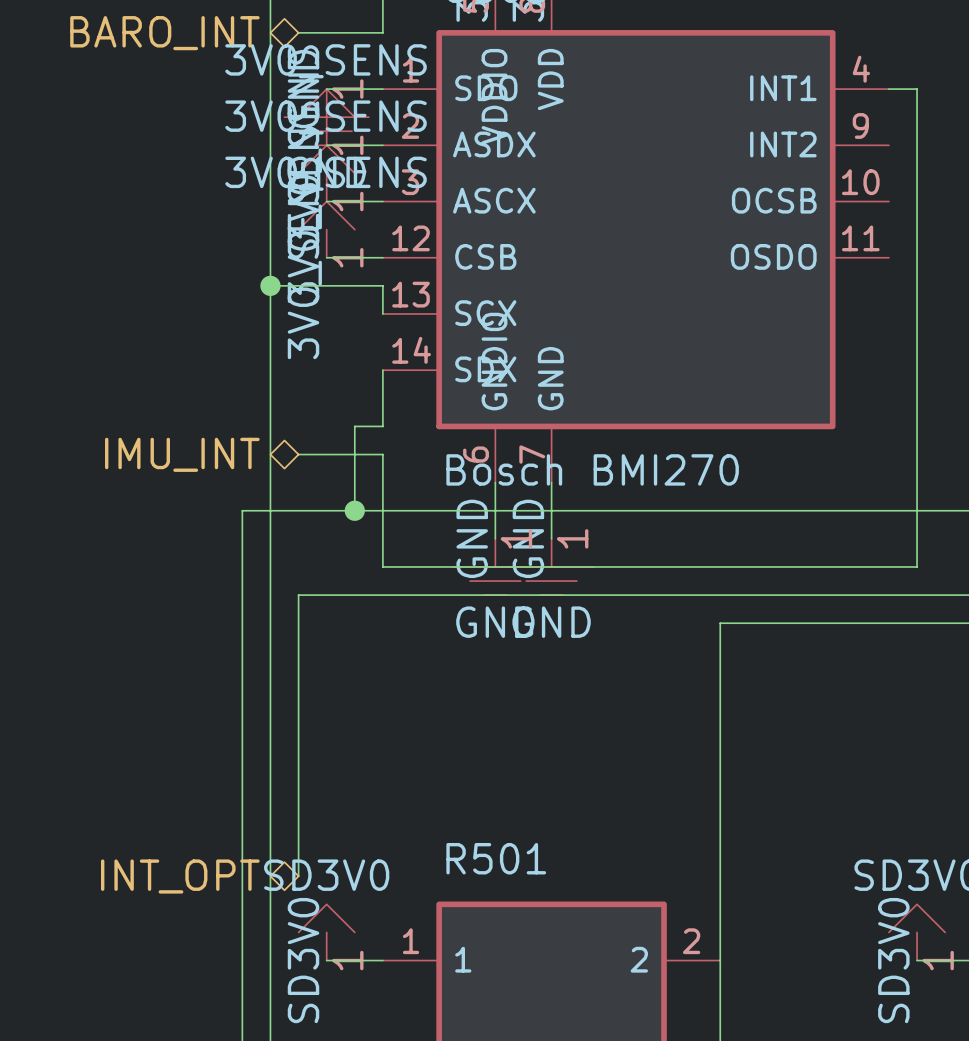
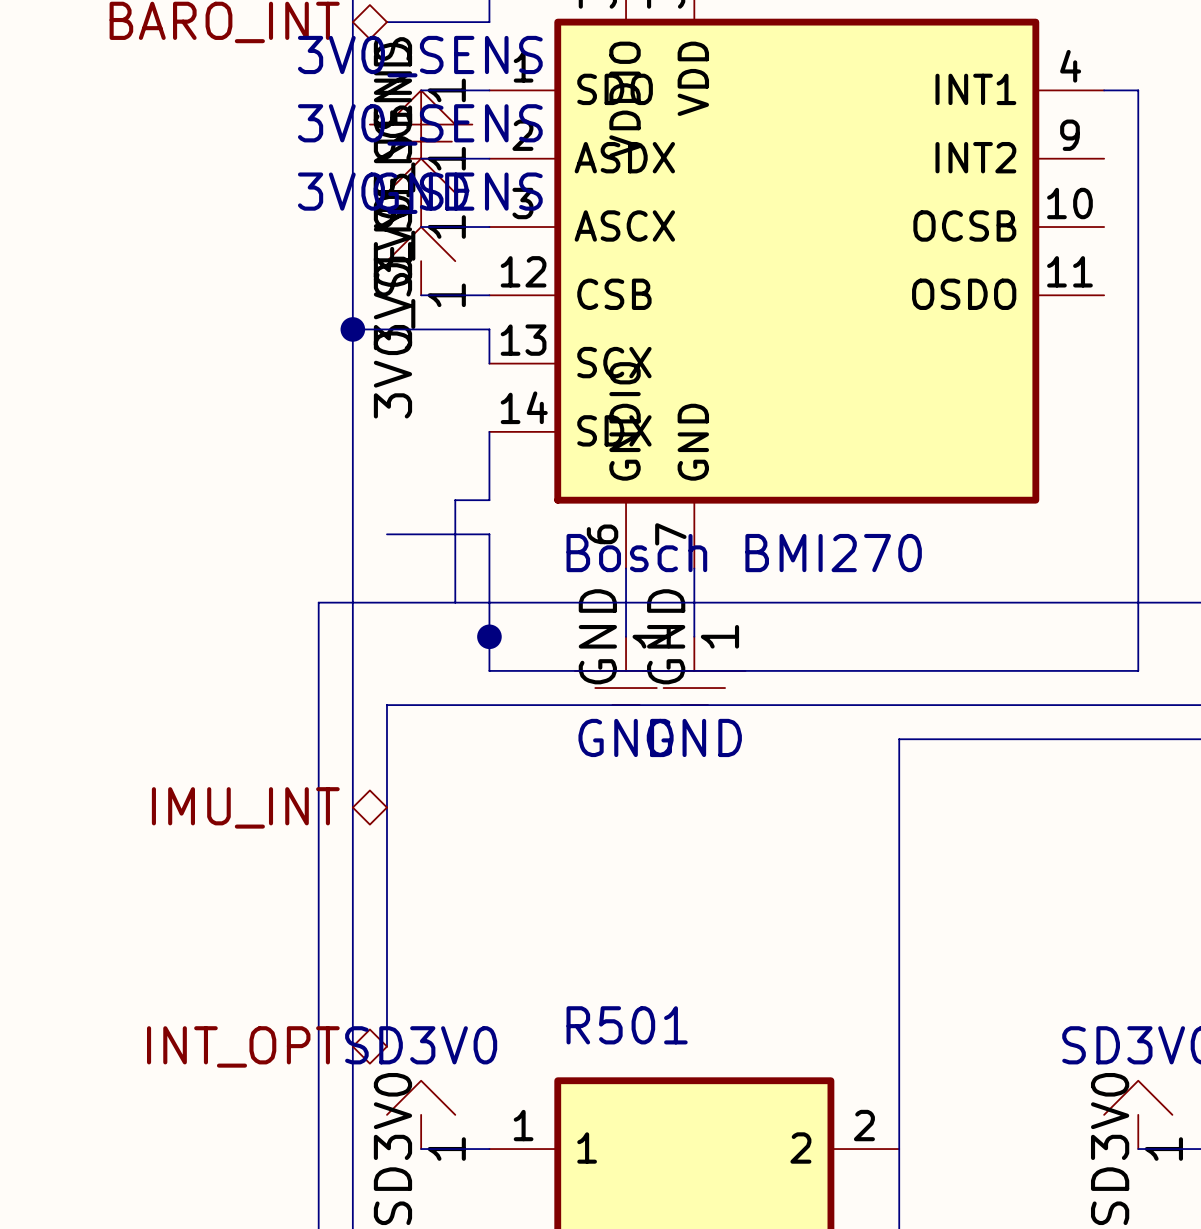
hierarchical label position: IMU_INT (182, 454) -> IMU_INT (245, 807)
junction position: (354, 510) -> (489, 636)

